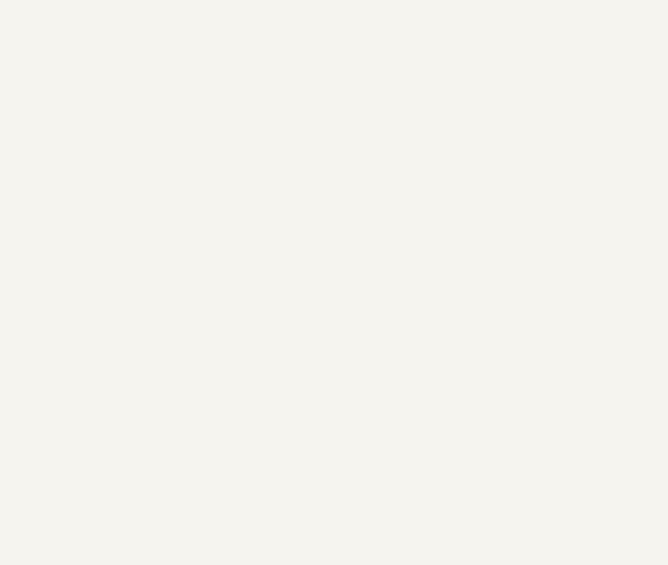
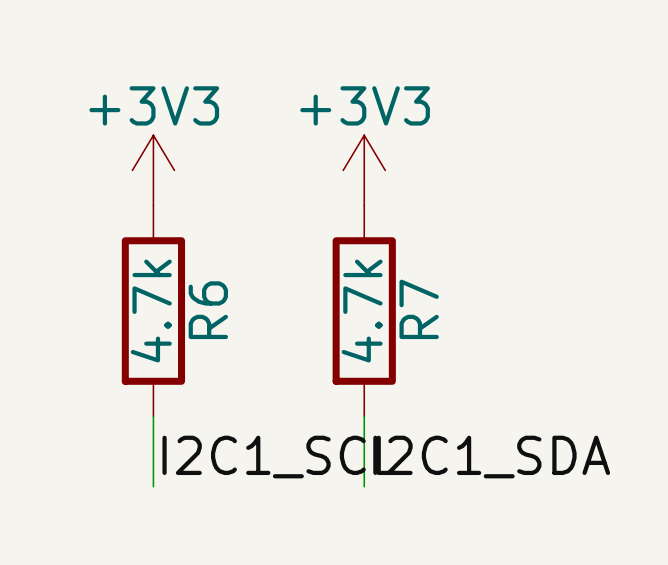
power symbol: none -> +3V3 (153, 170)
power symbol: none -> +3V3 (364, 170)
R6: none -> 4.7k (153, 311)
R7: none -> 4.7k (364, 311)
wire: none -> (153, 416) (153, 486)
wire: none -> (364, 416) (364, 486)
label: none -> I2C1_SCL (280, 457)
label: none -> I2C1_SDA (491, 457)

